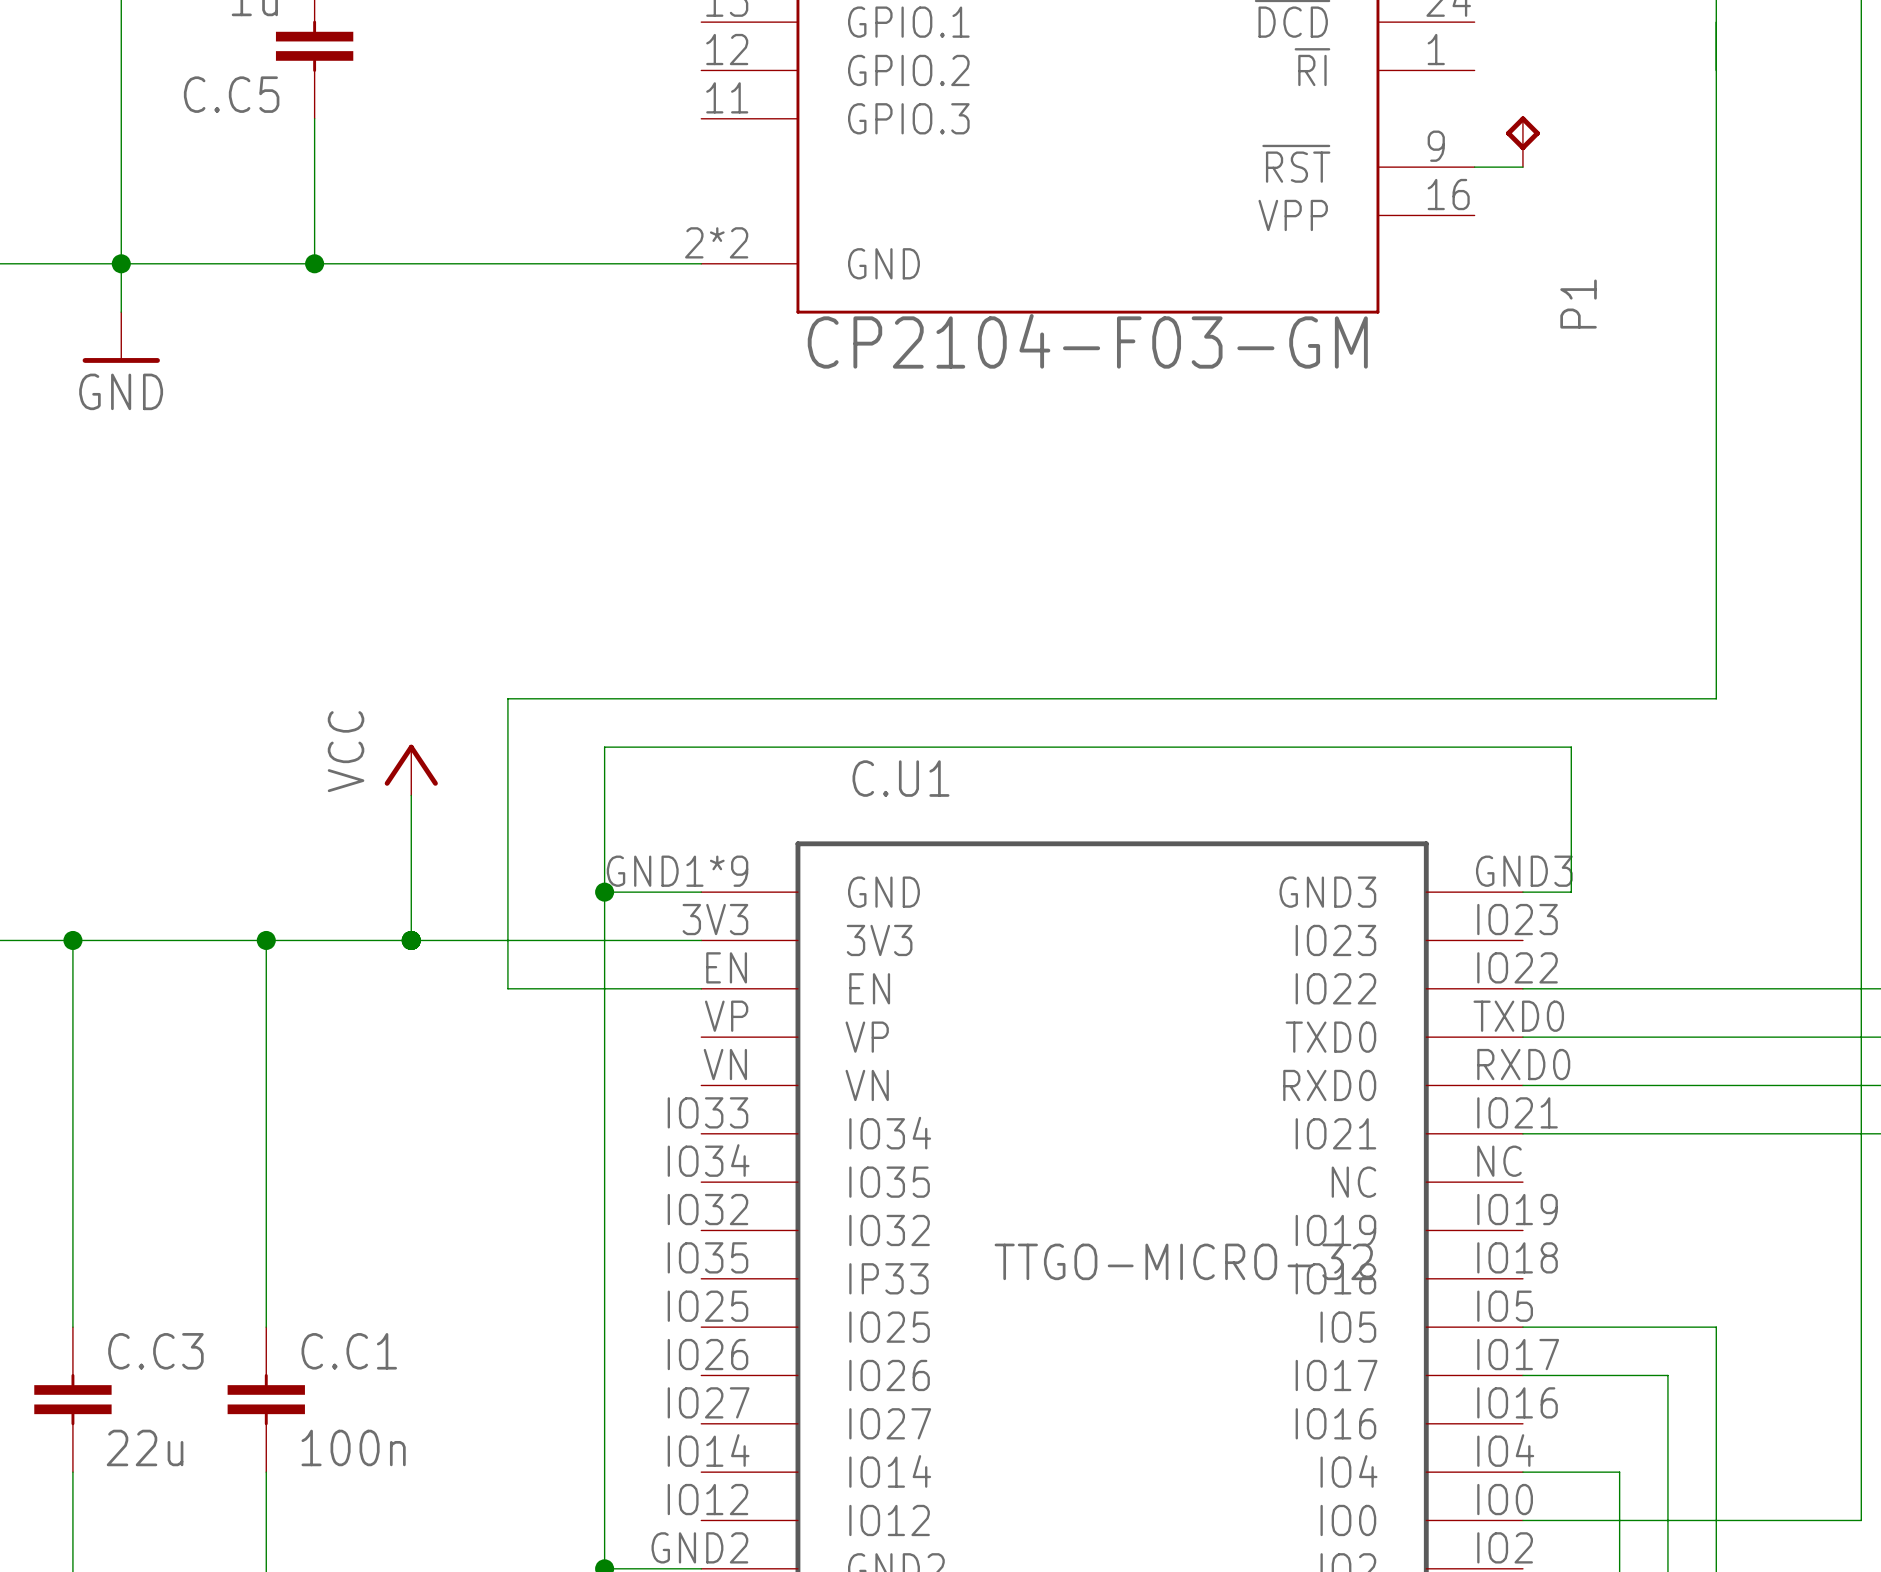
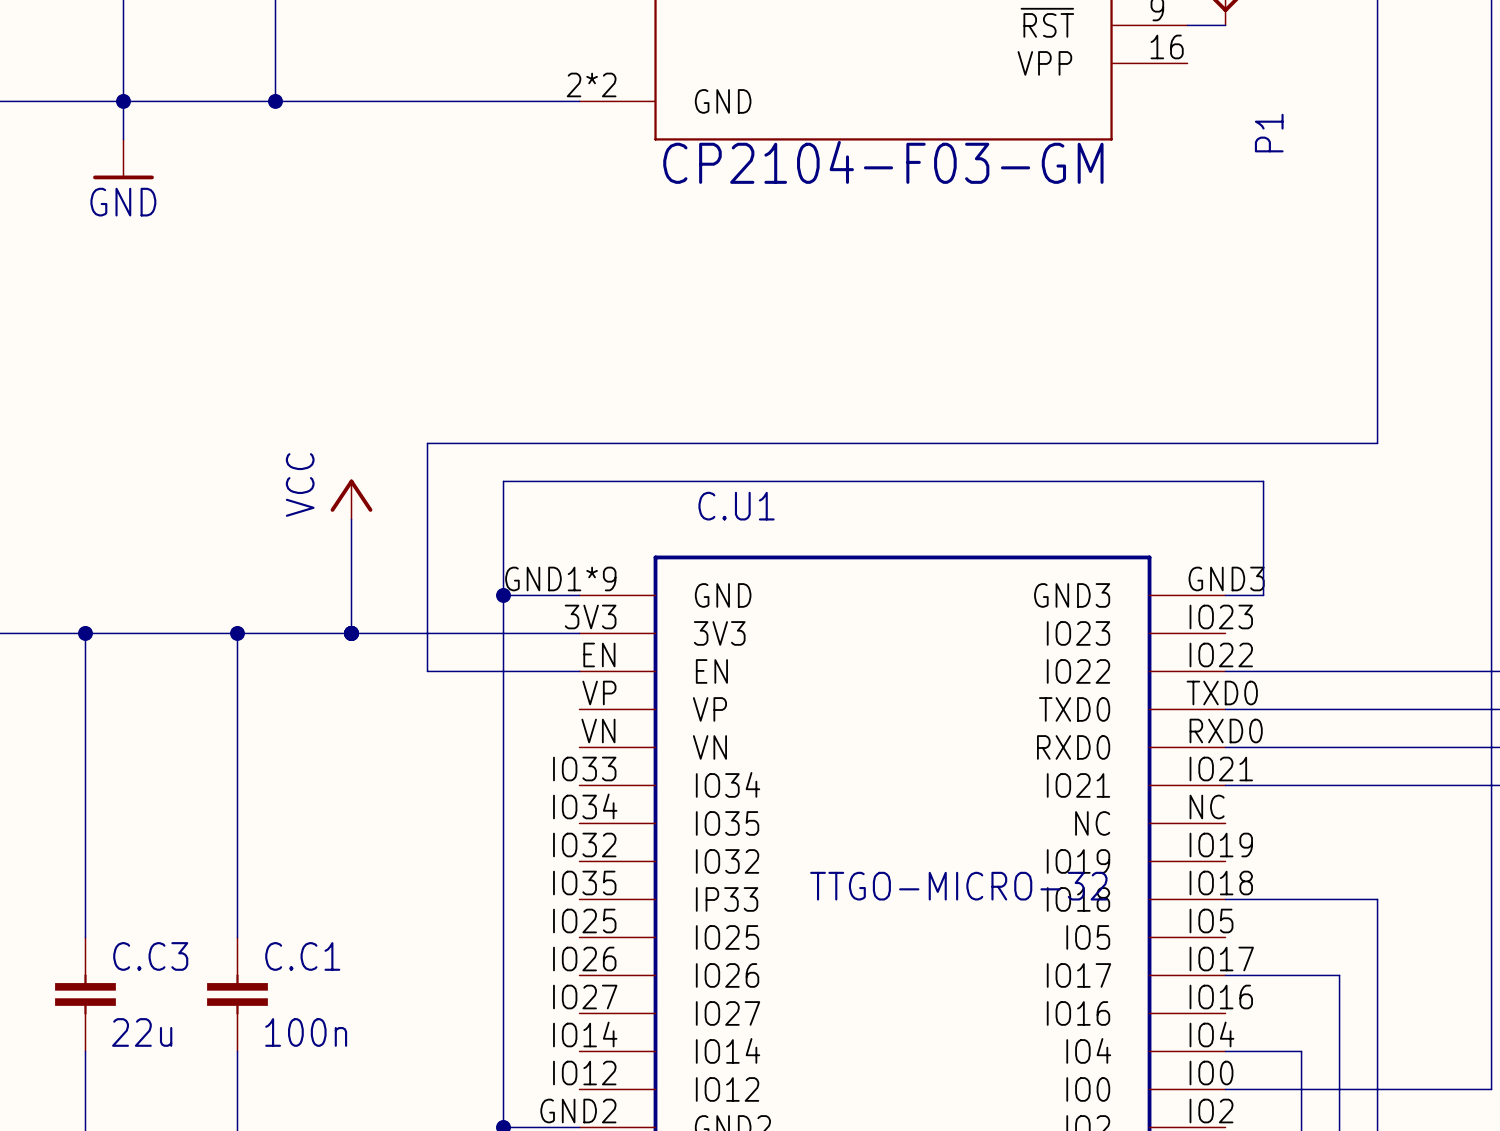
wire: (1522, 1327) (1716, 1327) -> (1225, 899) (1377, 899) (1377, 937)

